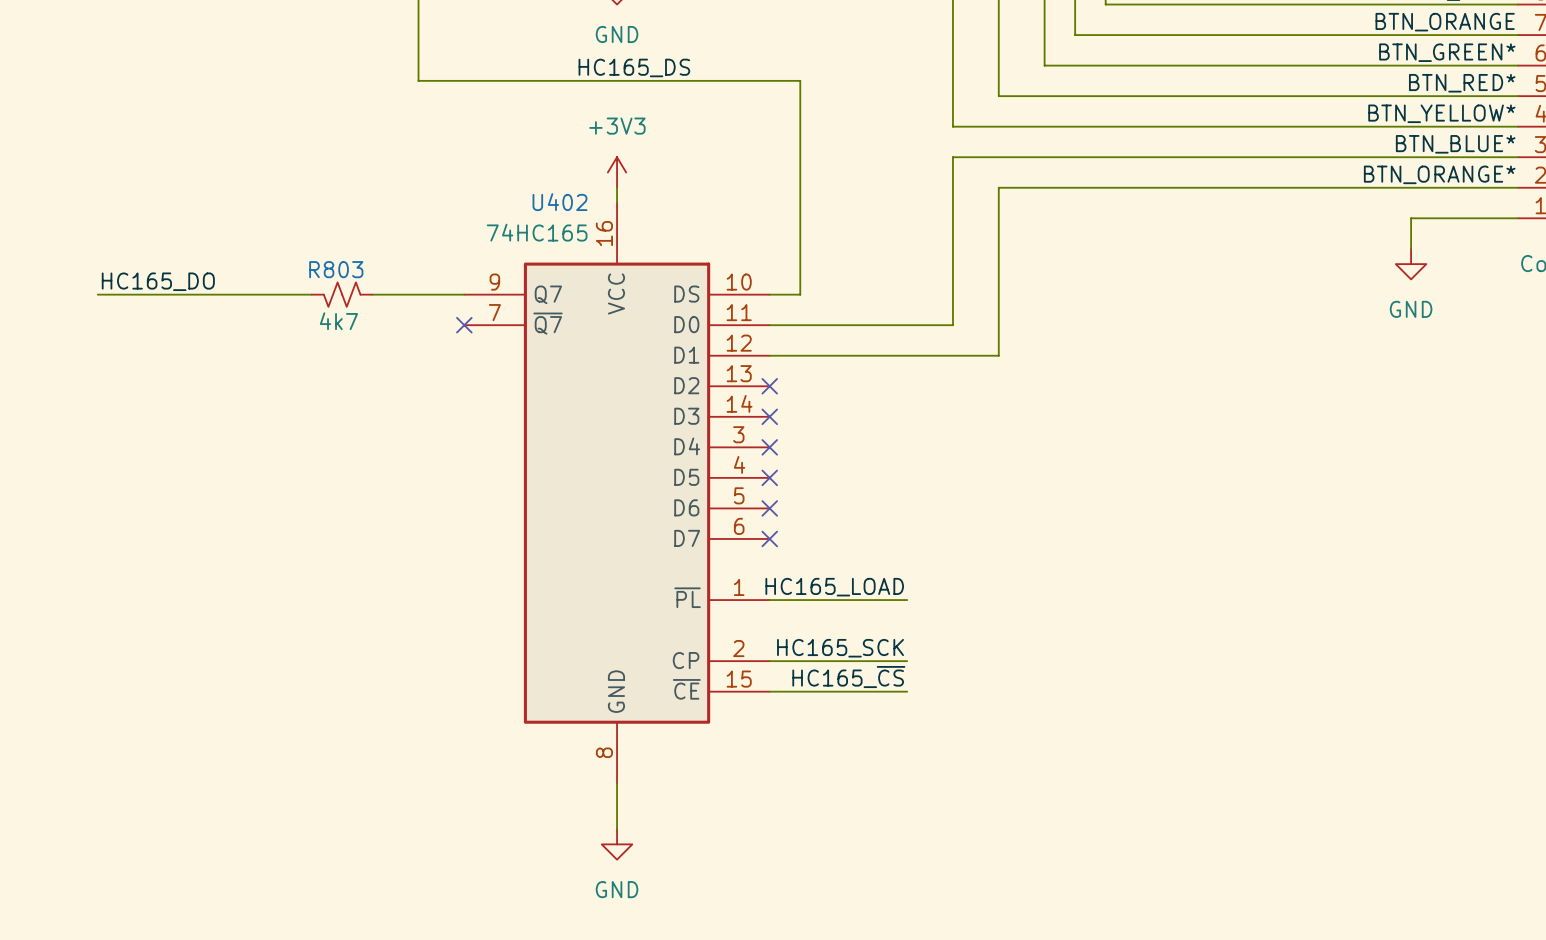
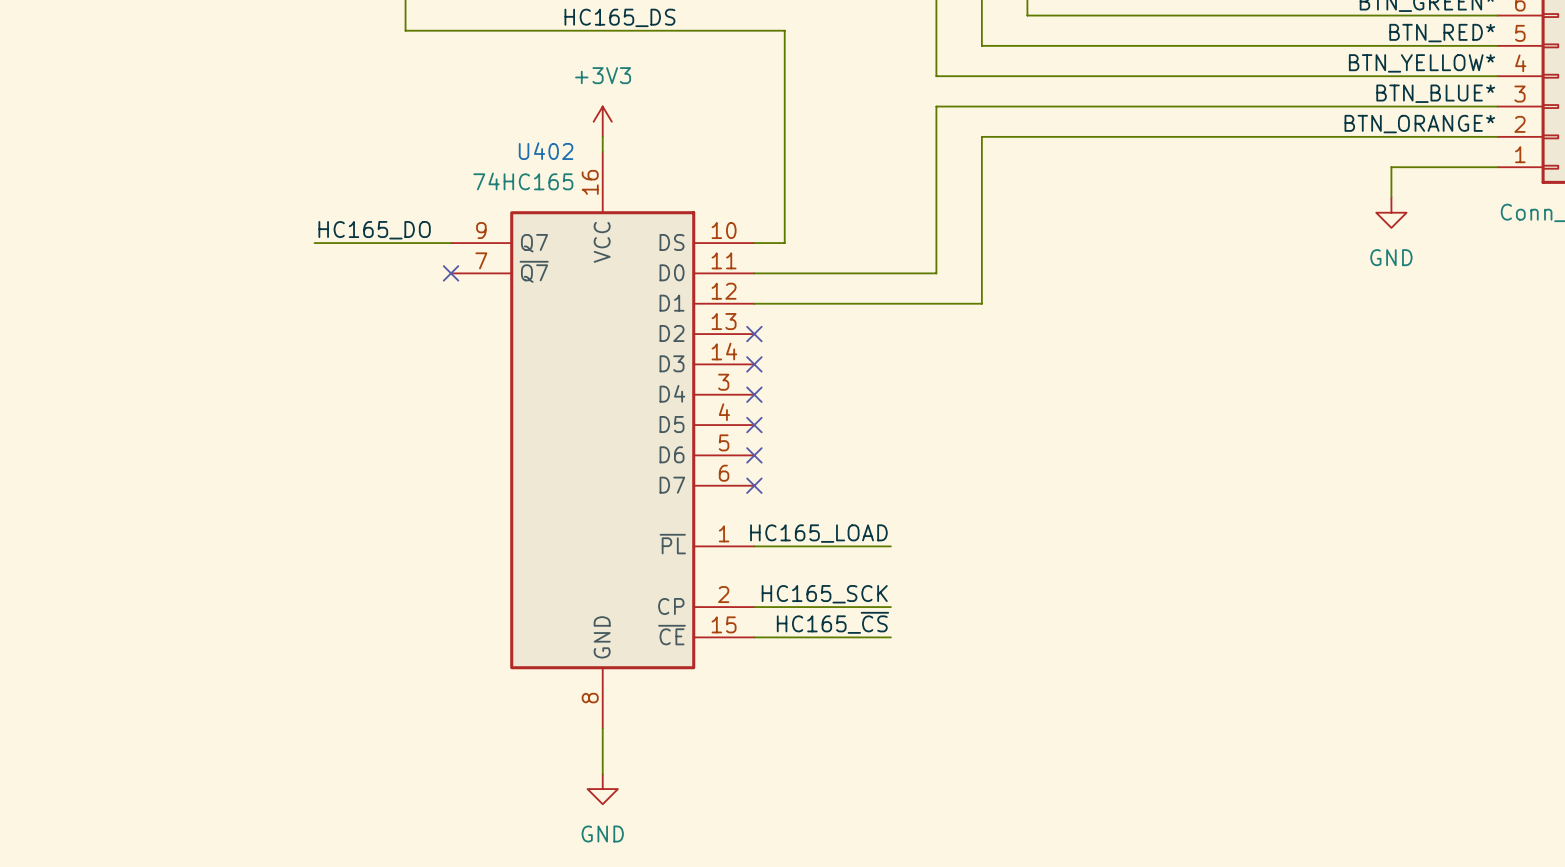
label position: HC165_DO (158, 281) -> HC165_DO (374, 230)
wire: (97, 294) (311, 294) -> none
wire: none -> (314, 243) (360, 243)
R803: 4k7 (342, 294) -> none

